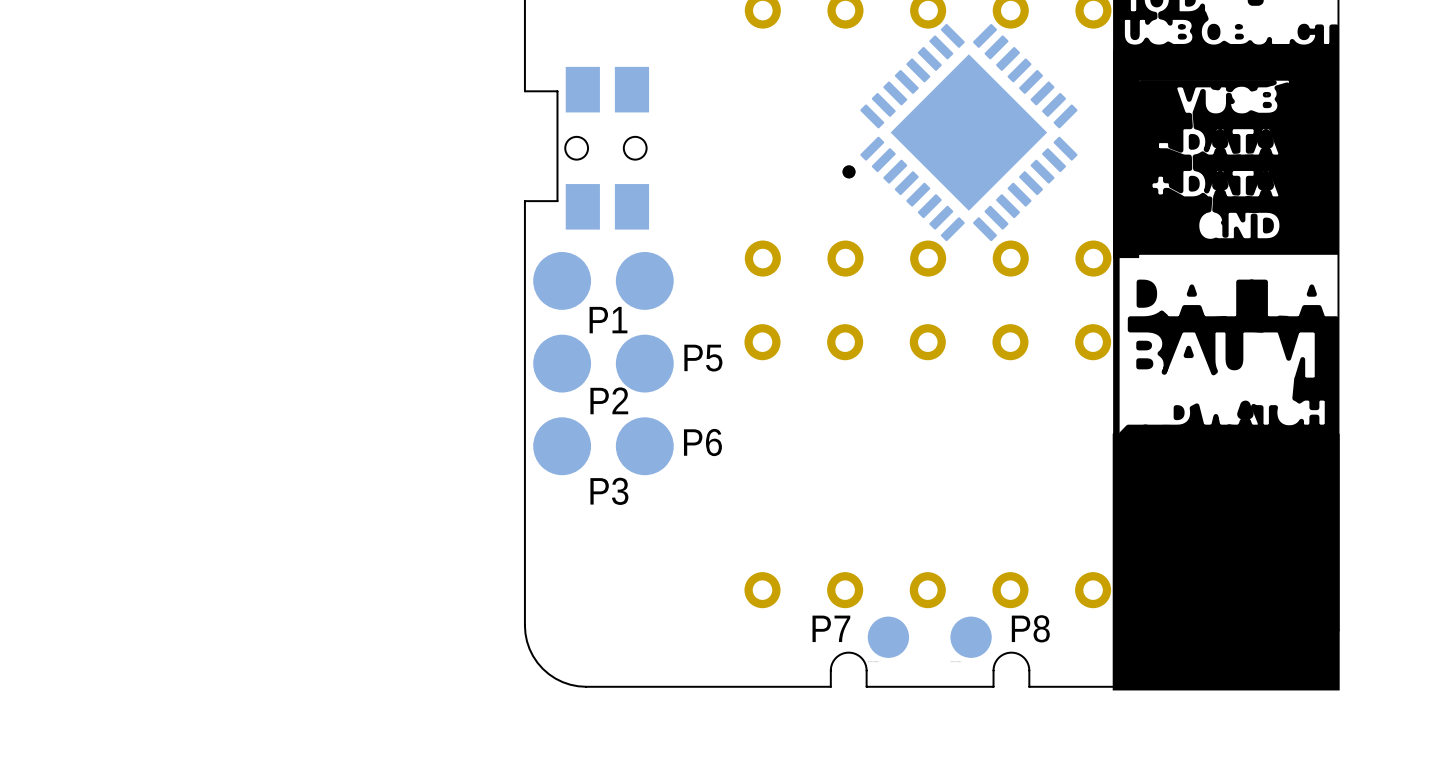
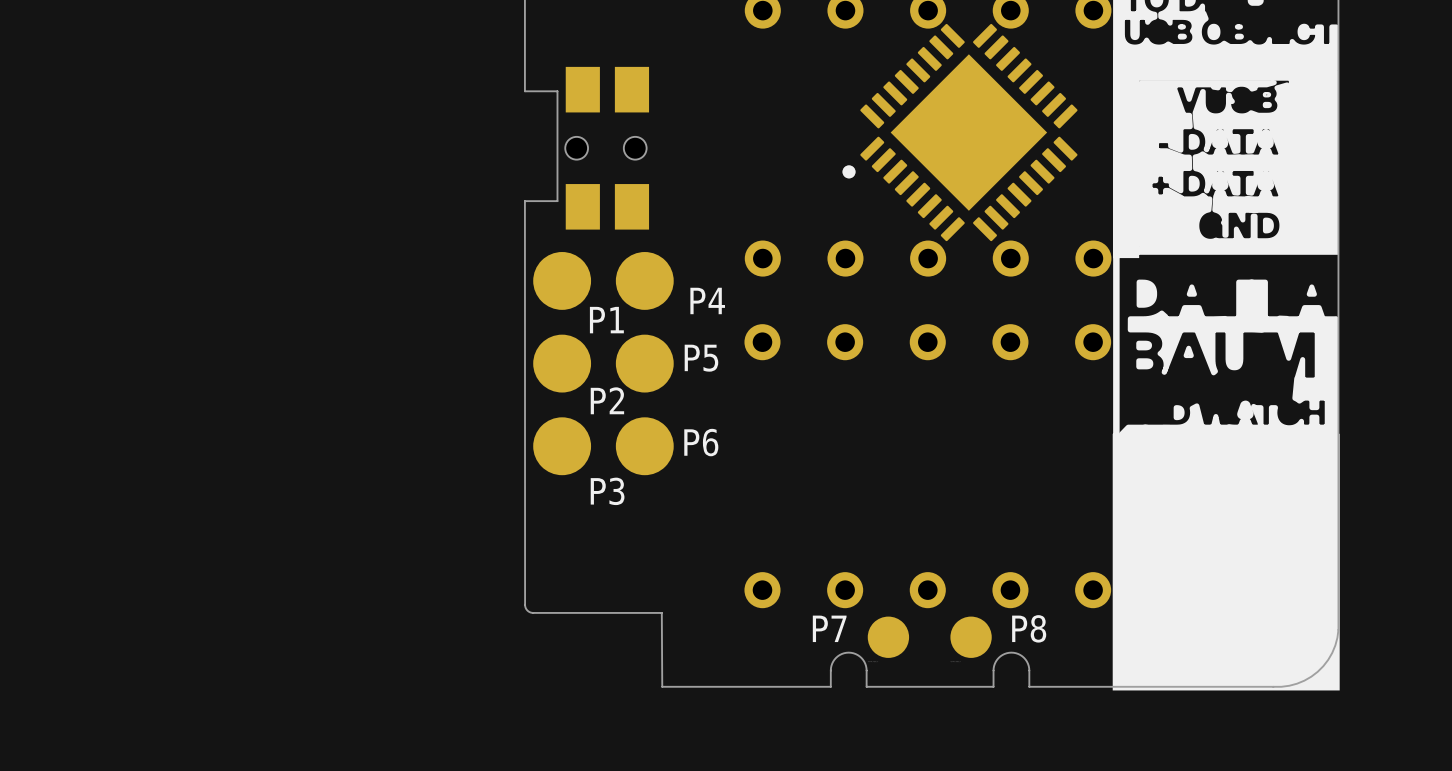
board edge: (524, 201) (524, 625) (527, 641) (533, 656) (542, 668) (555, 678) (570, 684) (586, 686) (662, 686) -> (524, 201) (525, 606) (528, 611) (533, 612) (661, 612) (662, 686)
text: none -> P4 (707, 300)

